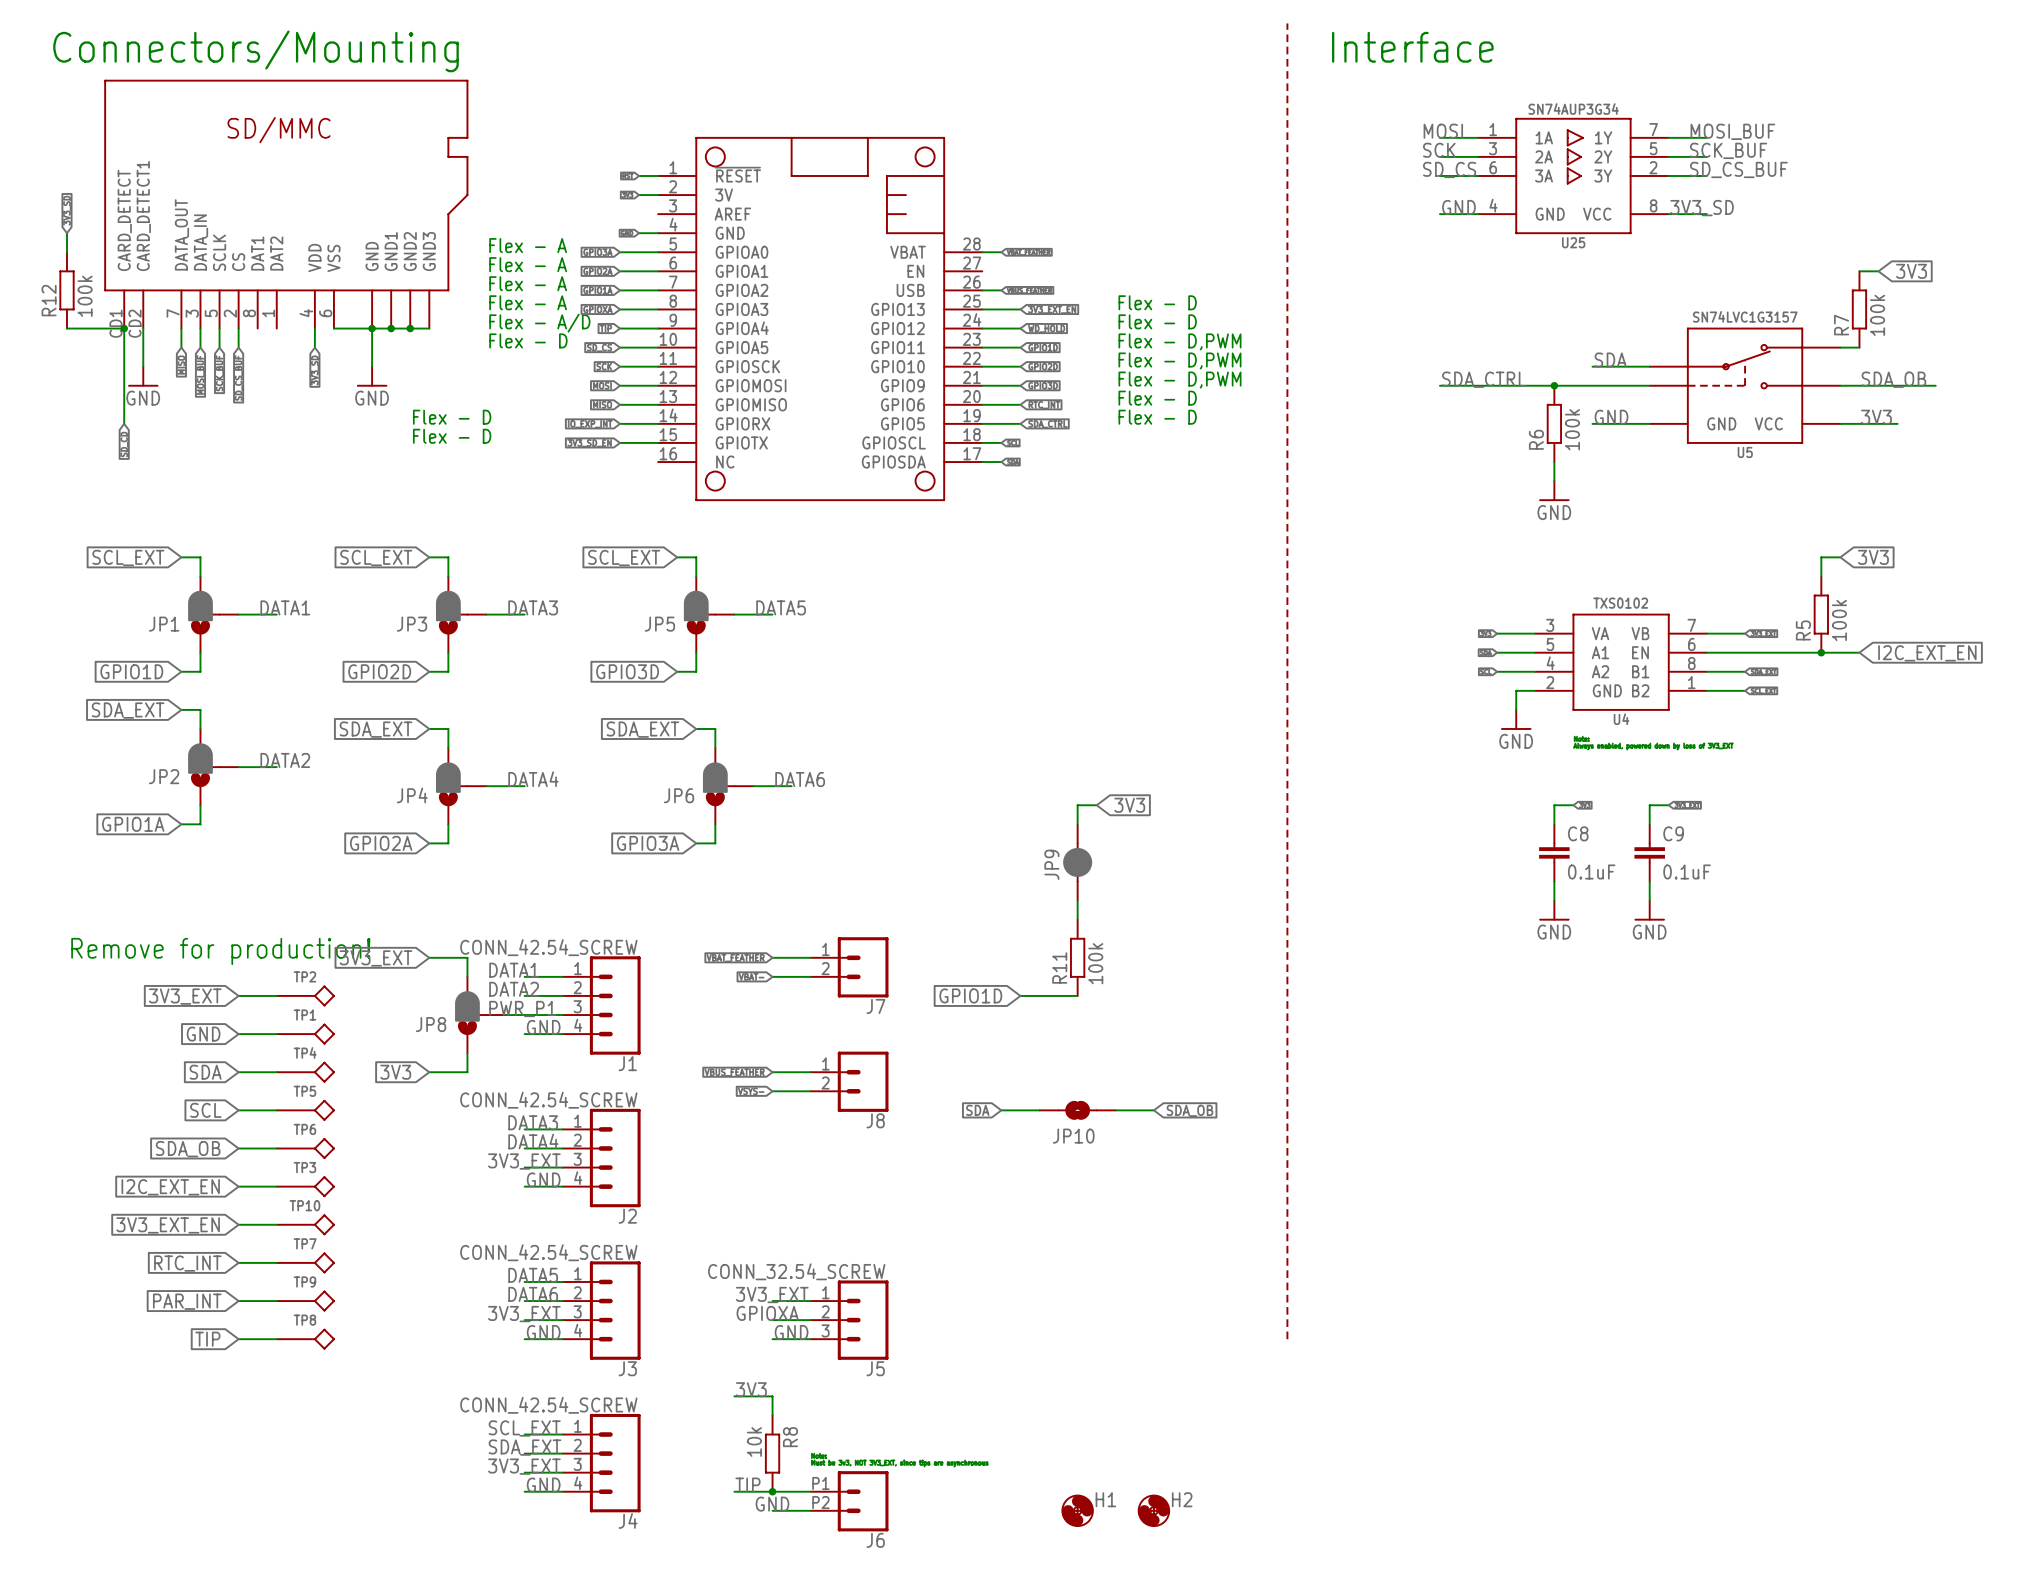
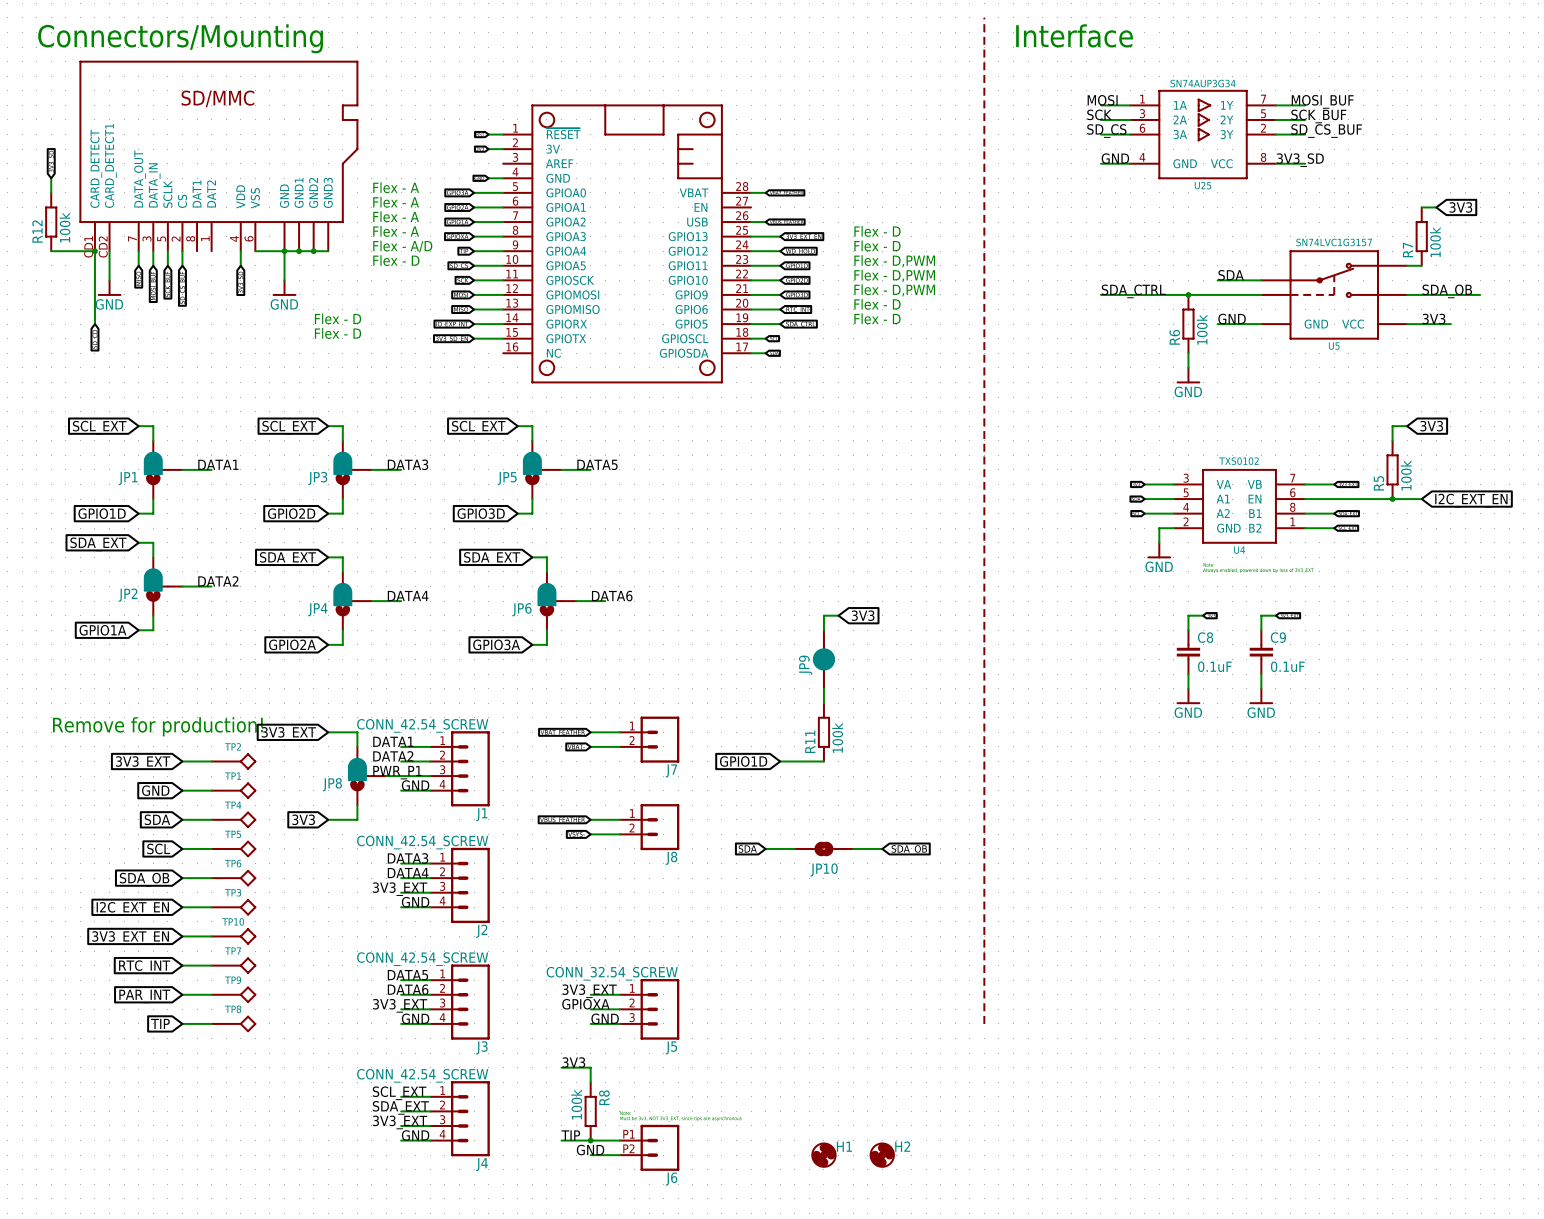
R8 value: 10k (754, 1442) -> 100k (576, 1104)

